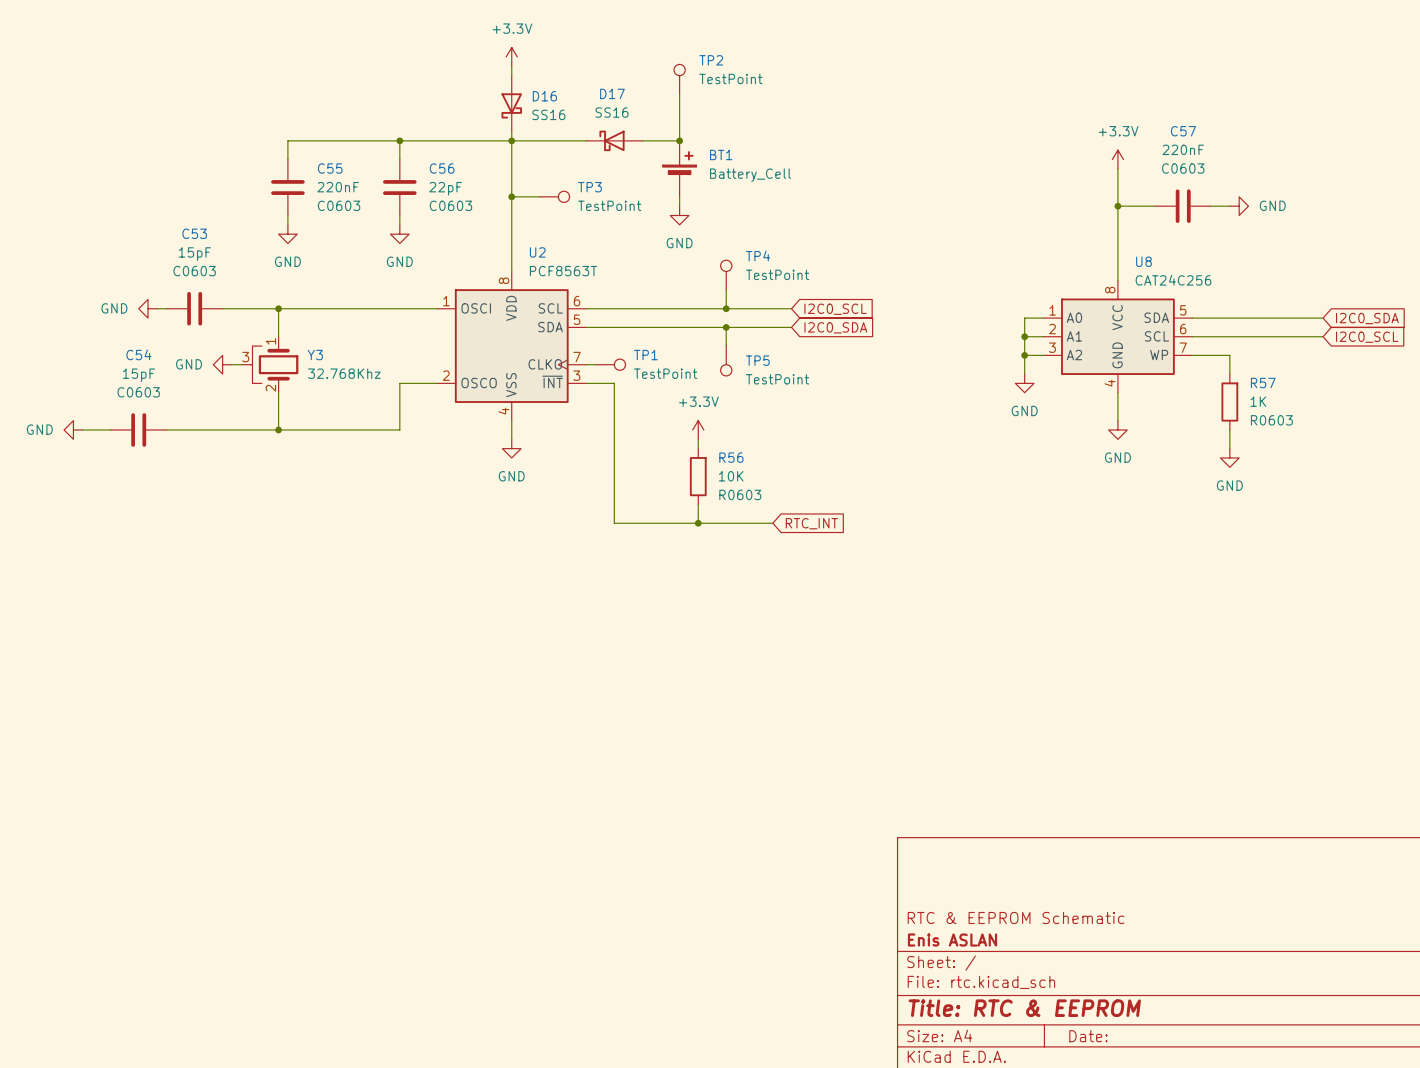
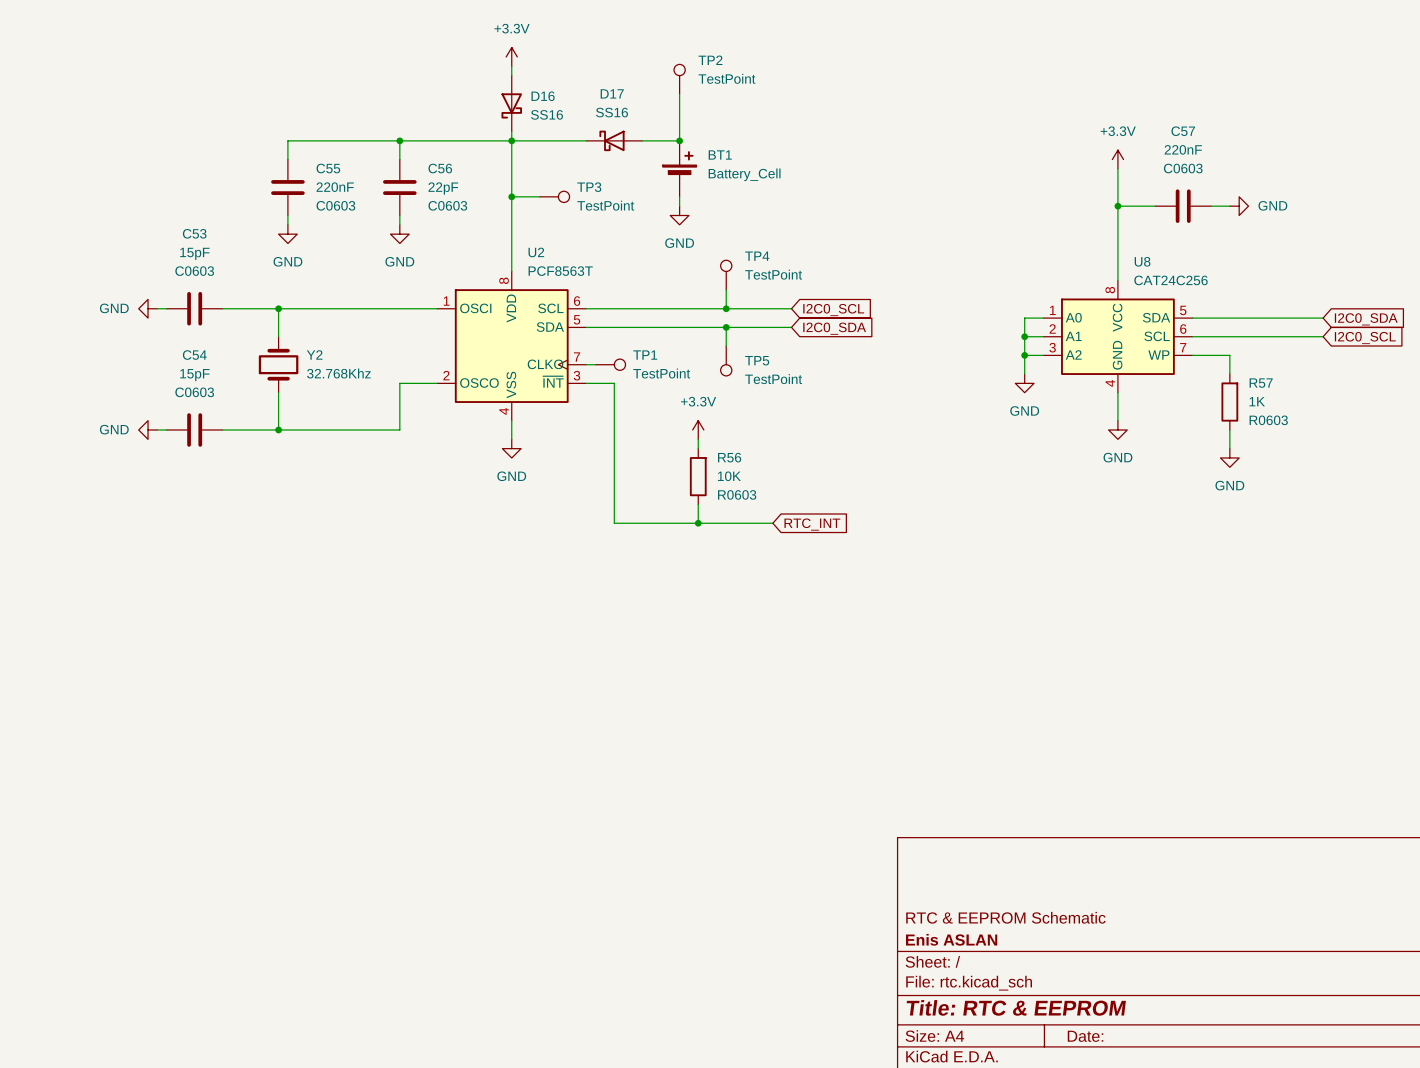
power symbol: GND (222, 364) -> none
wire: (231, 364) (241, 364) -> none
Y3: 32.768Khz (269, 364) -> none
Y2: none -> 32.768Khz (278, 364)
power symbol: GND (73, 430) -> none
wire: (82, 430) (110, 430) -> none
C54 position: (138, 430) -> (194, 430)
power symbol: none -> GND (148, 430)

